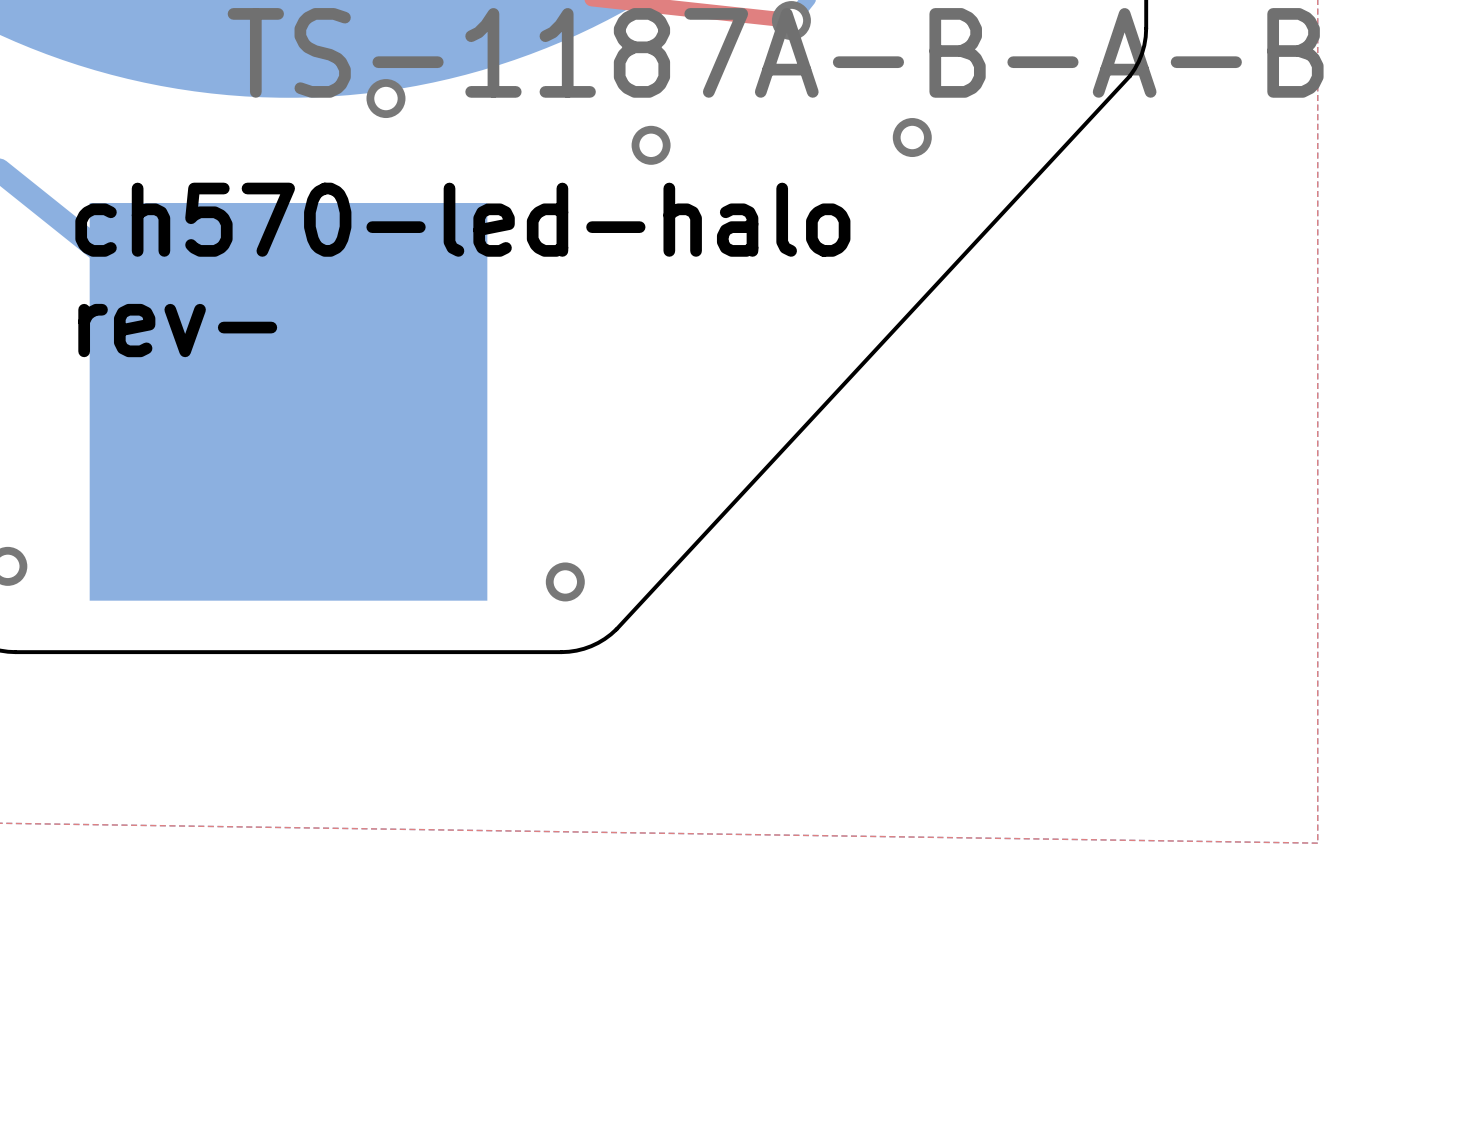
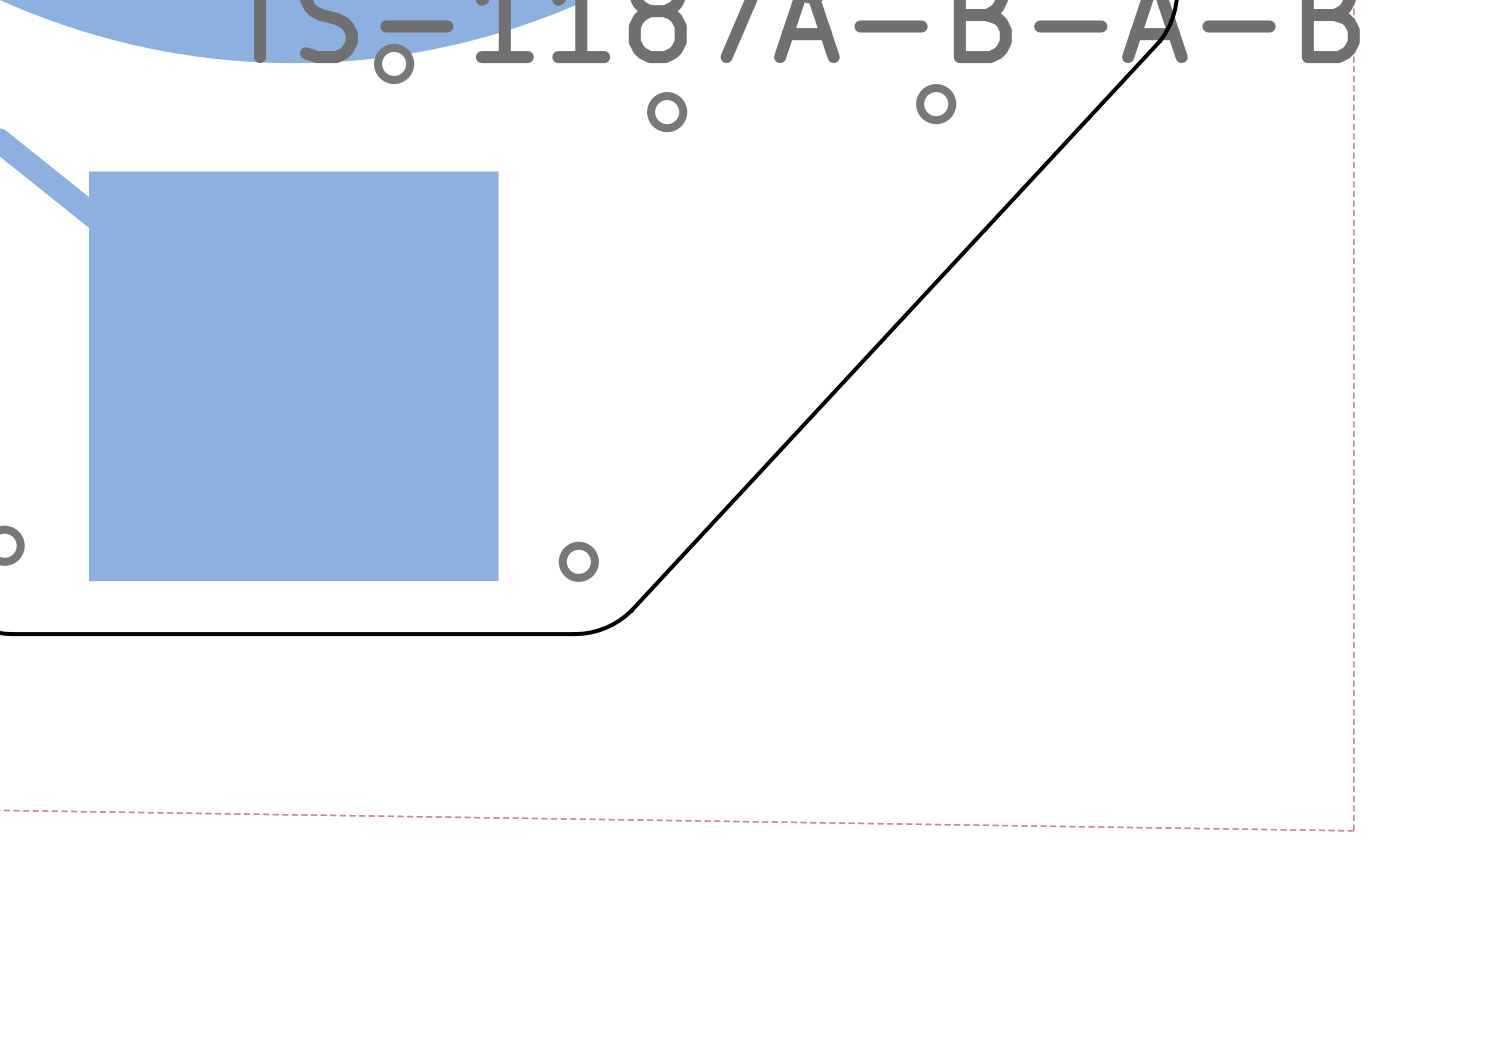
text: ch570-led-halo (462, 219) -> none
text: rev- (177, 330) -> none

